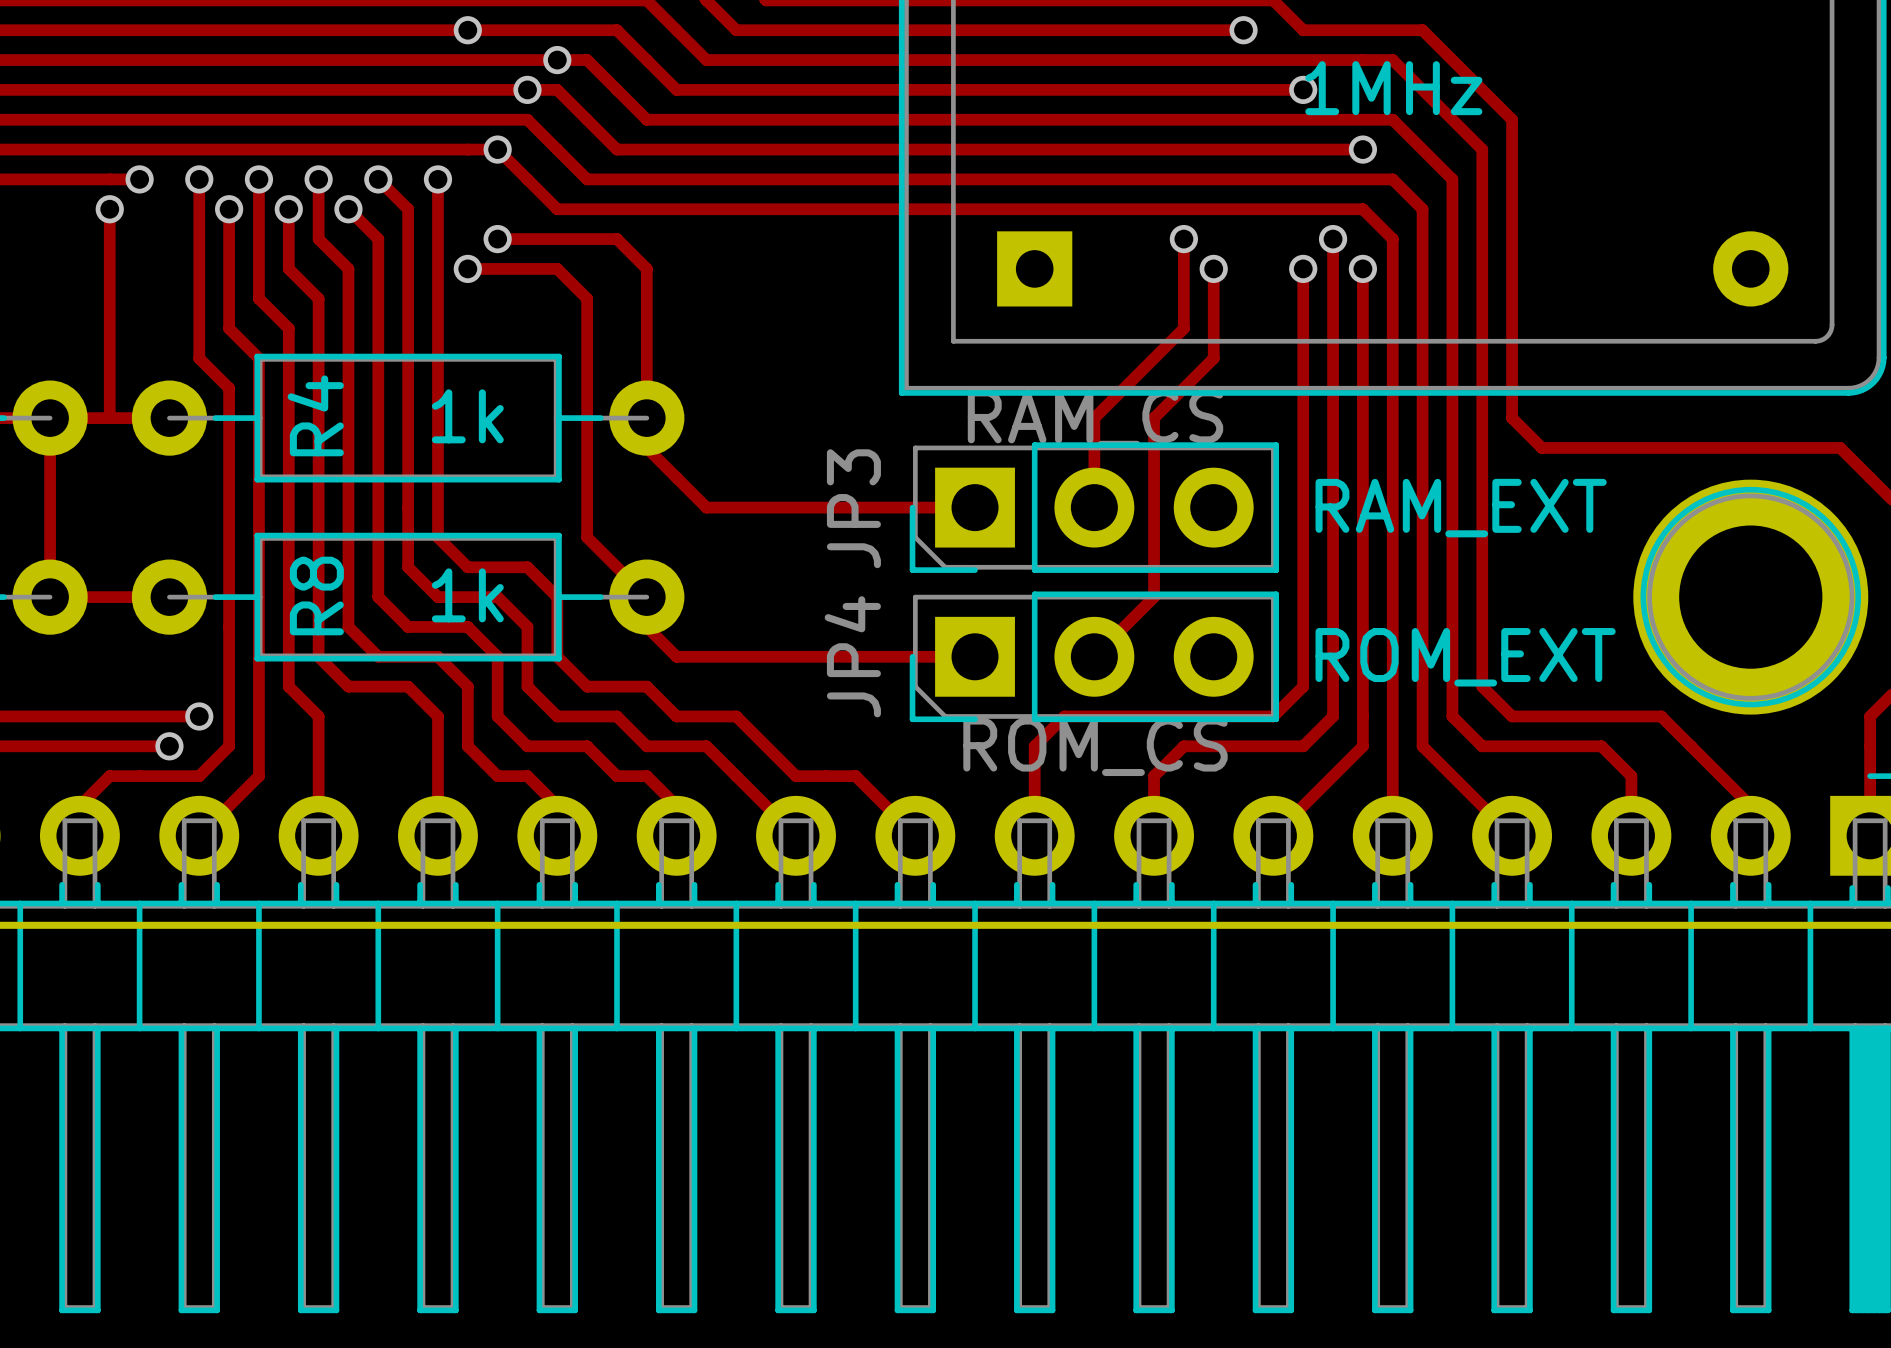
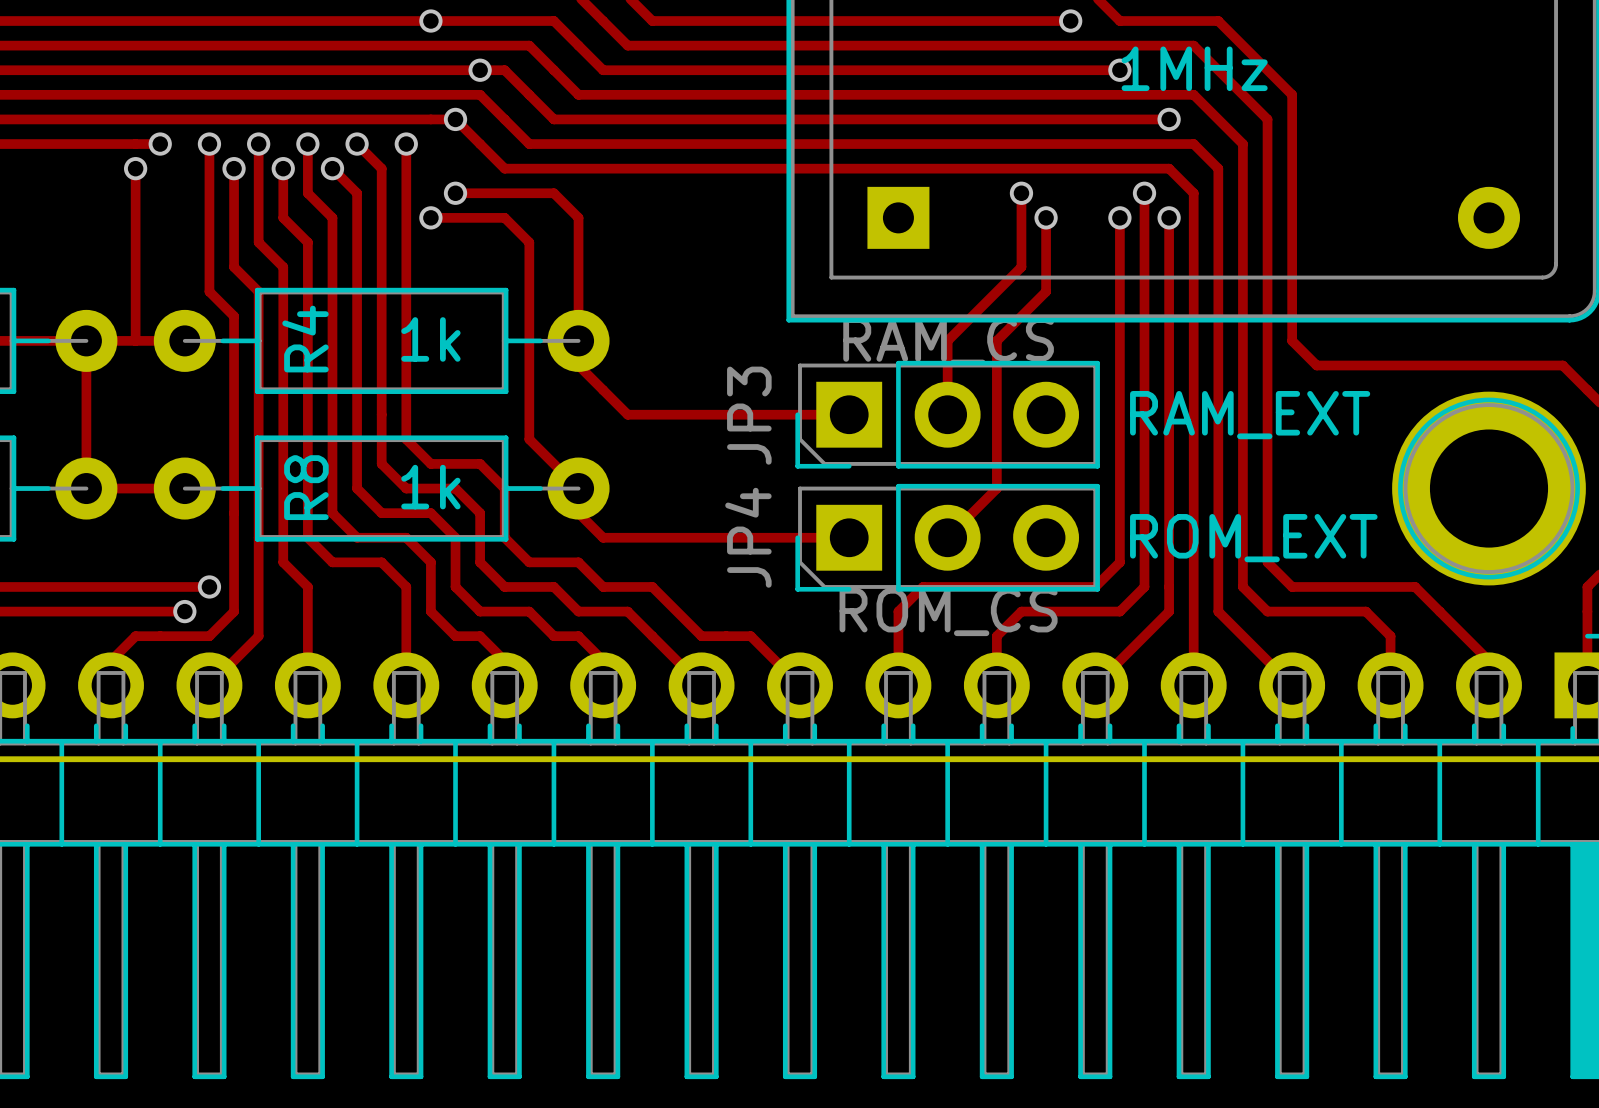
via: (557, 60) -> none

